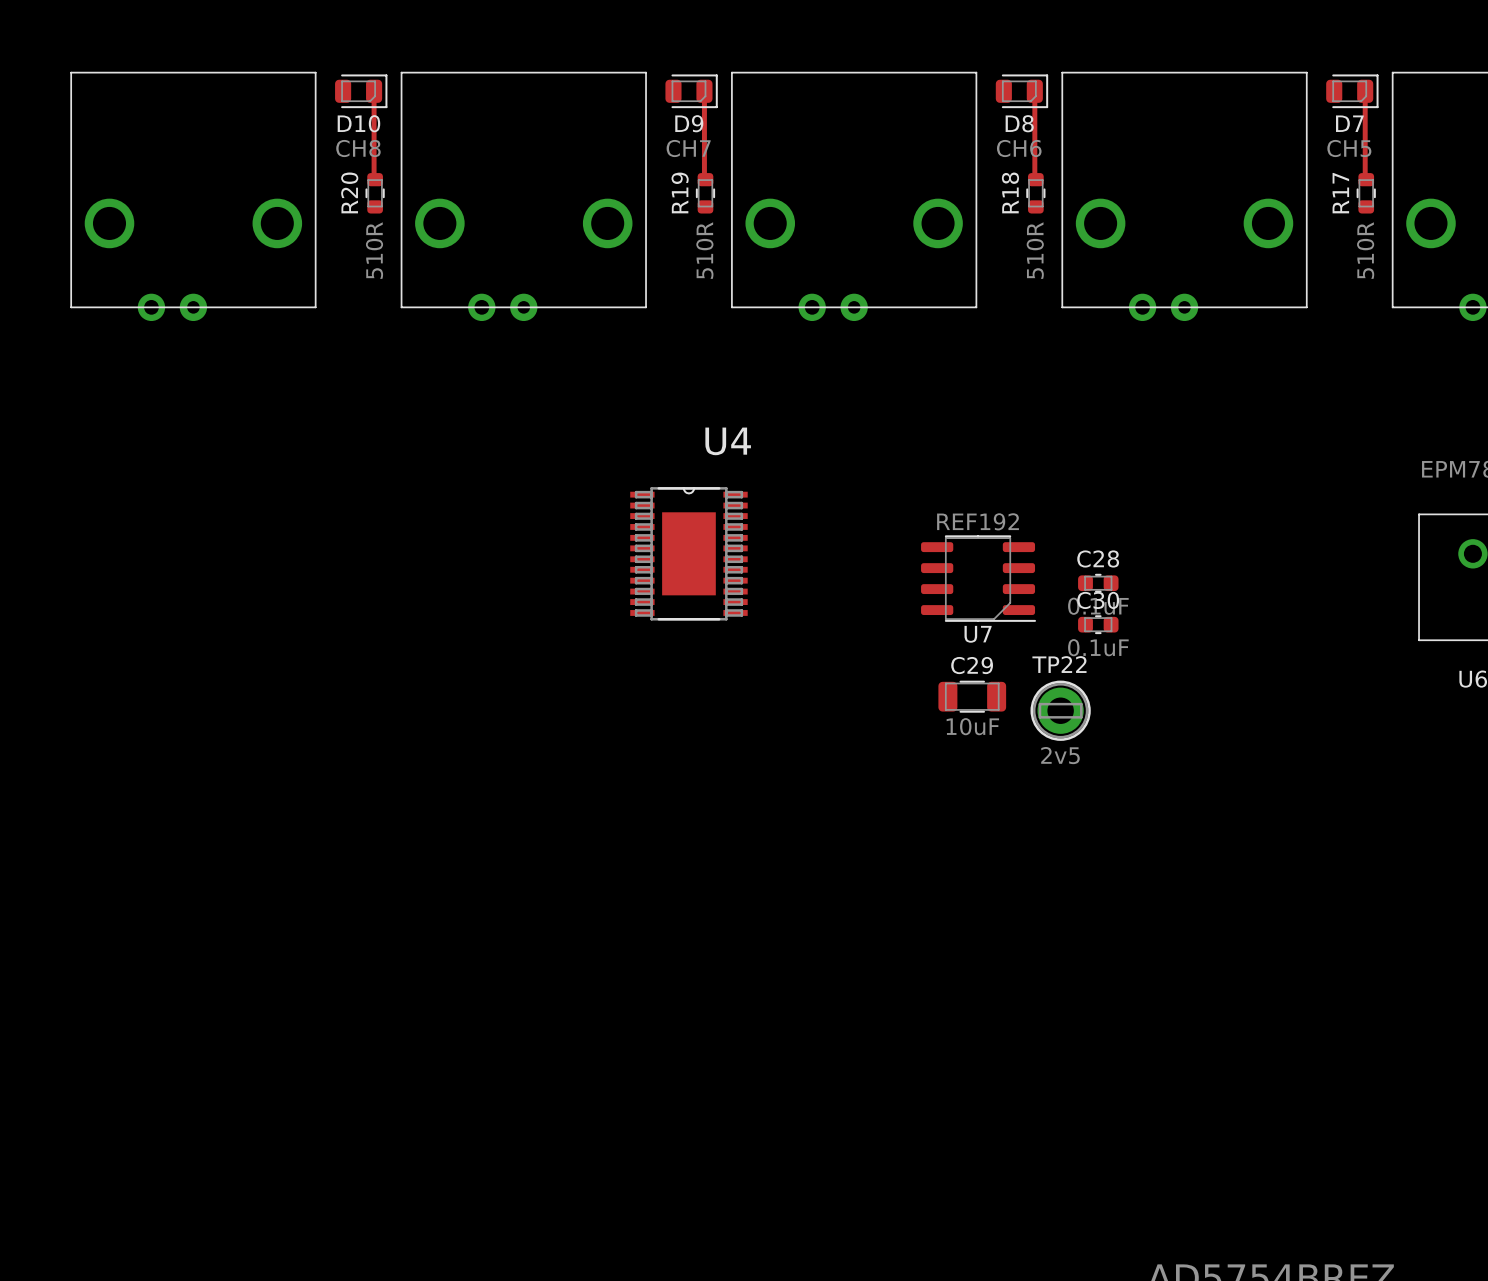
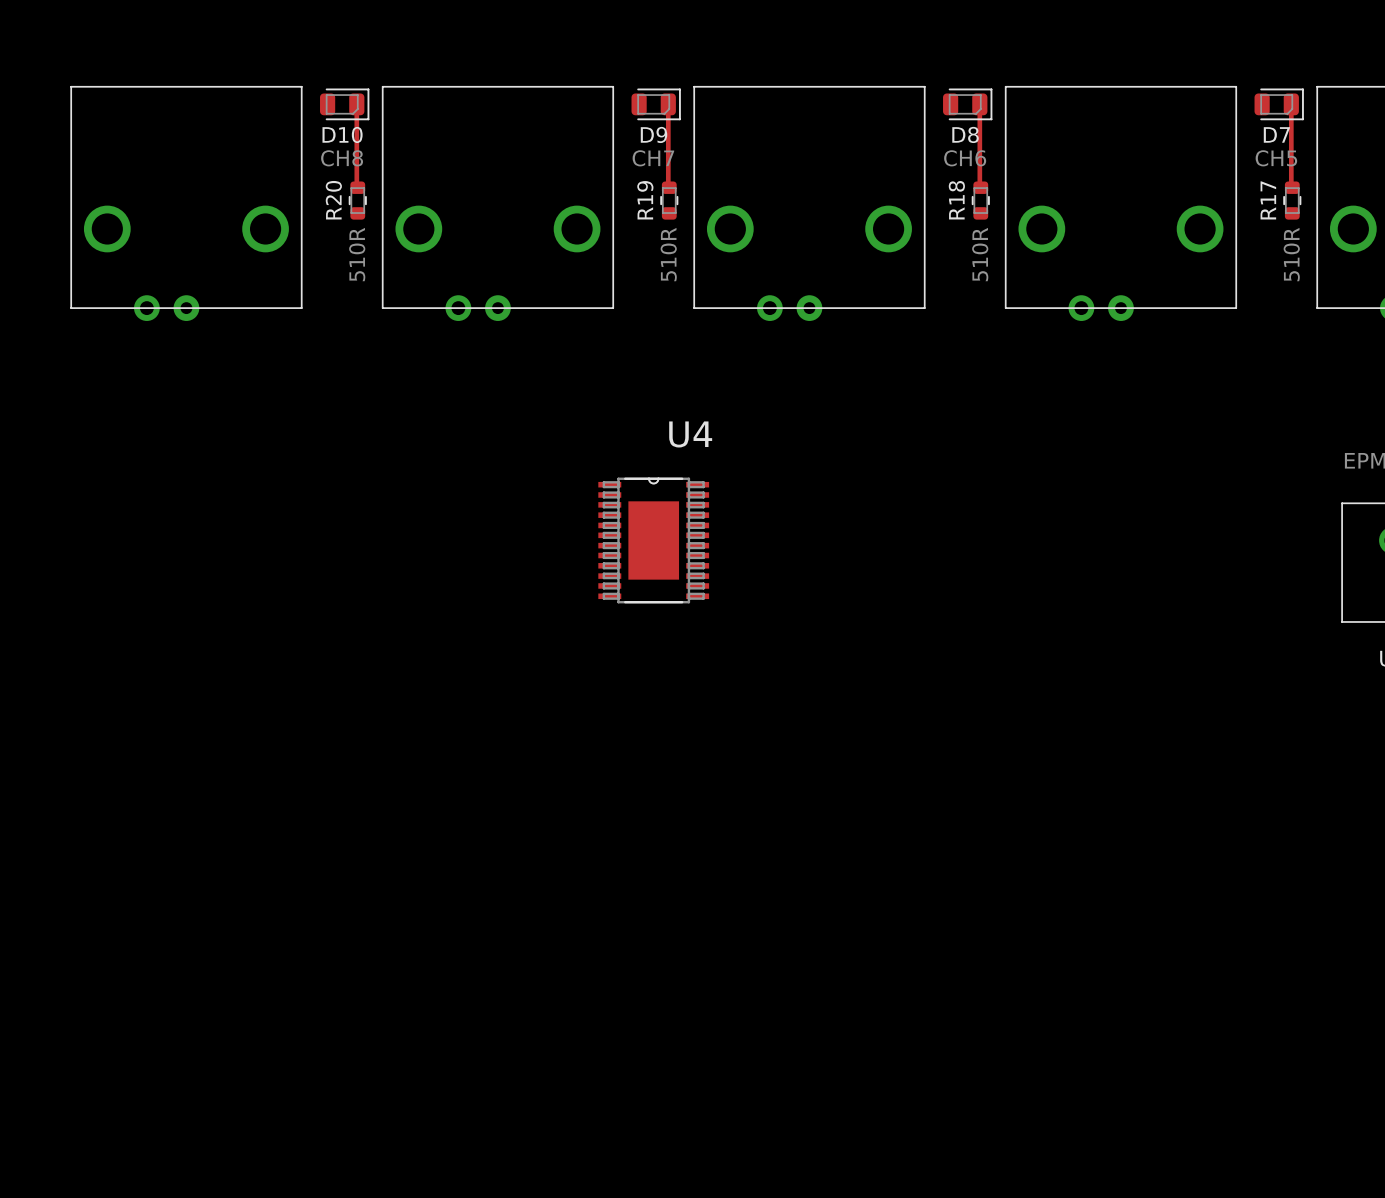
U7: REF192 (978, 578) -> none
C28: 0.1uF (1098, 583) -> none
C30: 0.1uF (1098, 624) -> none
C29: 10uF (972, 696) -> none
TP22: 2v5 (1060, 710) -> none

